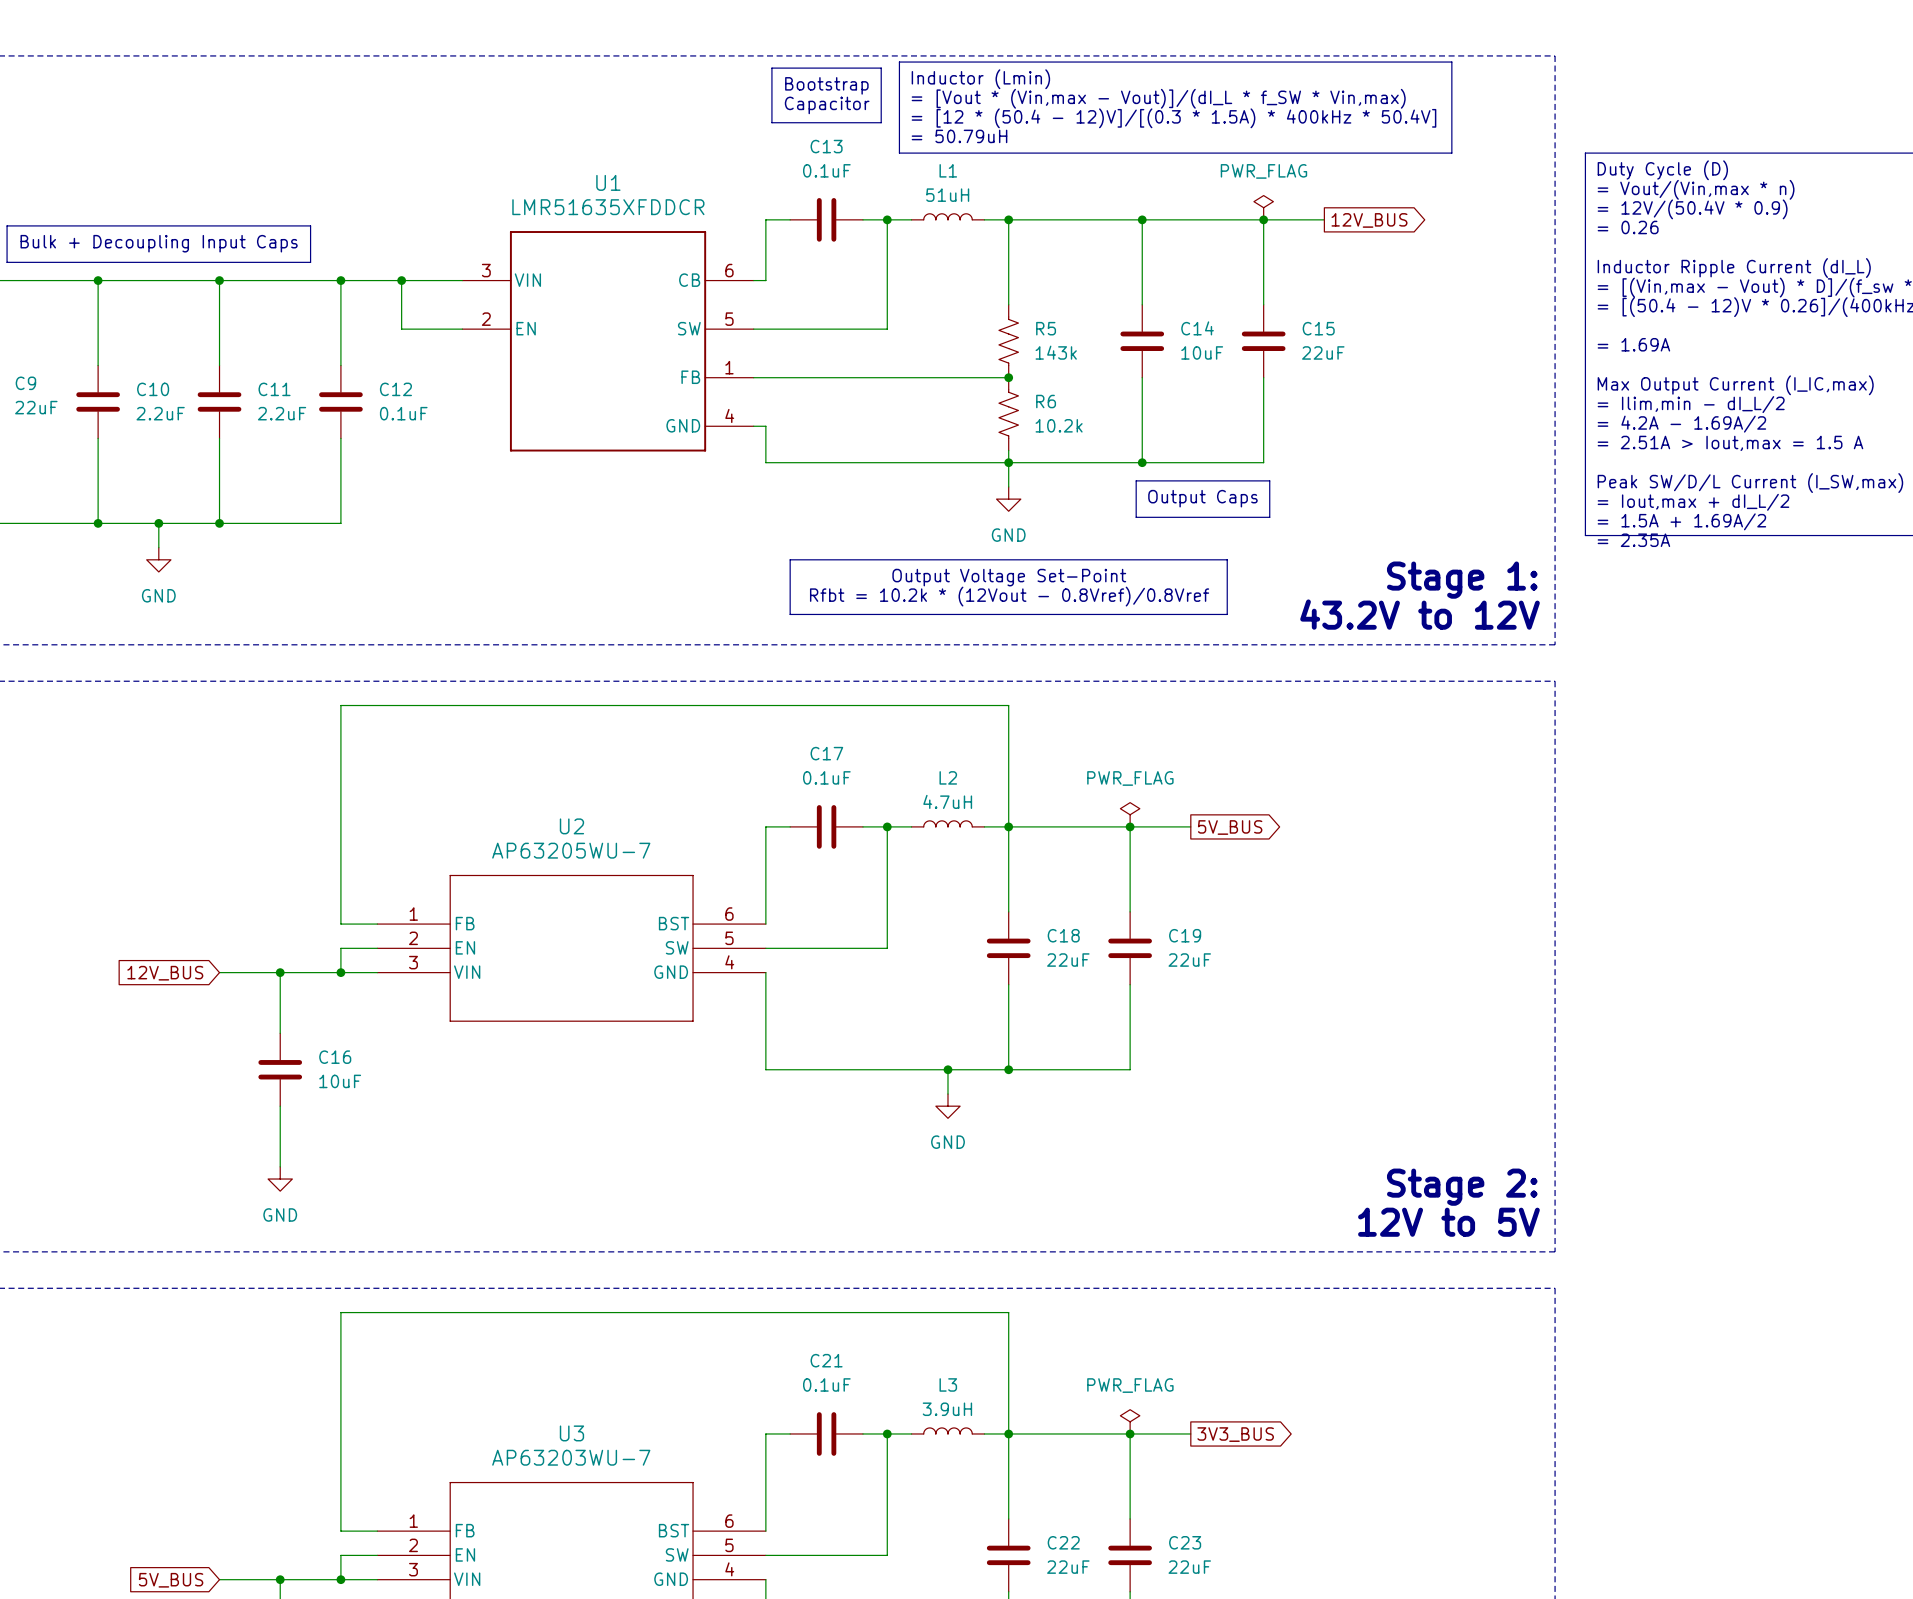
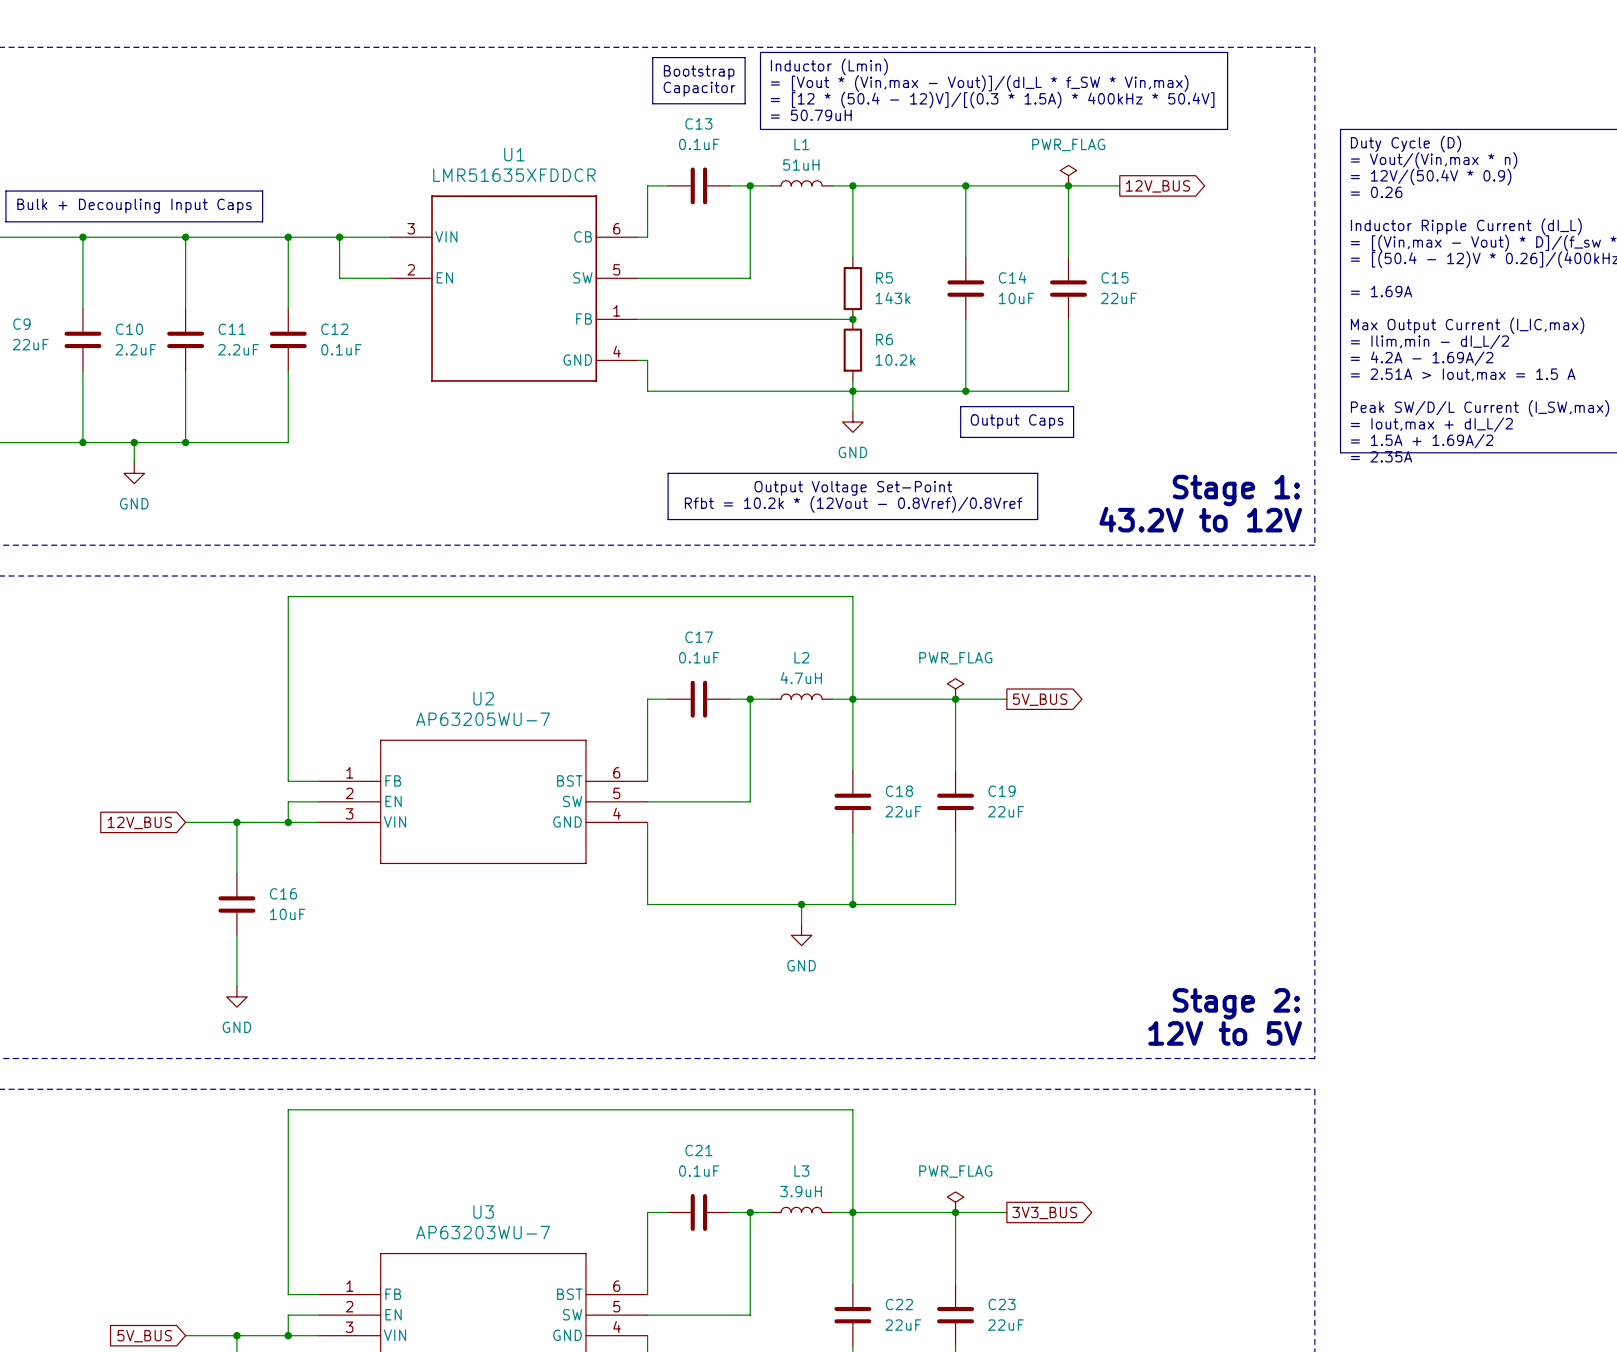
R5 symbol: [998, 304, 1019, 378] -> [843, 257, 863, 320]
R6 symbol: [998, 377, 1019, 451] -> [843, 319, 863, 381]

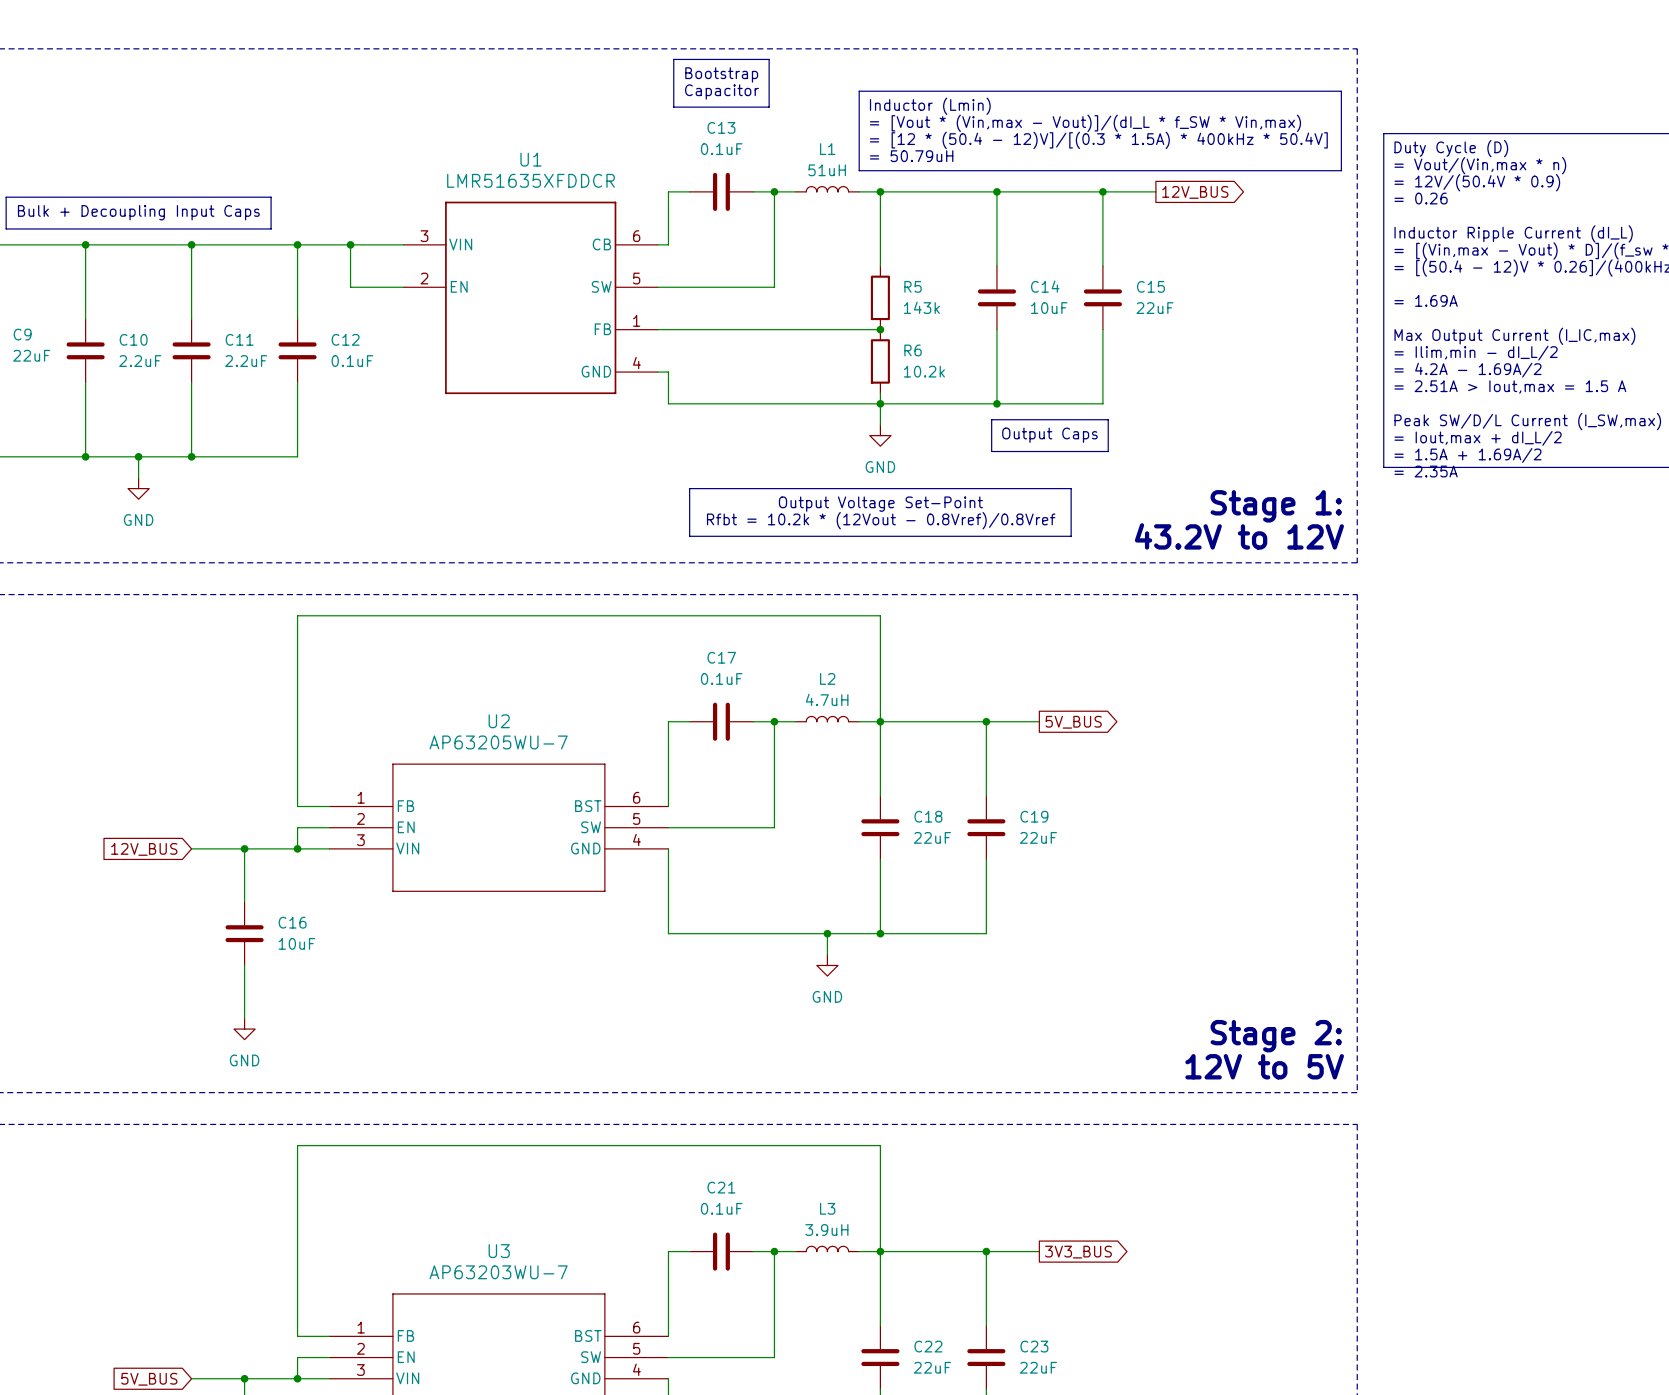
line: (760, 52) (1227, 52) (1227, 129) (760, 129) (760, 52) -> (859, 91) (1341, 91) (1341, 170) (859, 170) (859, 91)
text position: Inductor (Lmin) (829, 66) -> Inductor (Lmin) (930, 106)
text position: = [Vout * (Vin,max - Vout)]/(dI_L * f_SW * Vin,max) (979, 83) -> = [Vout * (Vin,max - Vout)]/(dI_L * f_SW * Vin,max) (1085, 123)
text position: = [12 * (50.4 - 12)V]/[(0.3 * 1.5A) * 400kHz * 50.4V] (992, 100) -> = [12 * (50.4 - 12)V]/[(0.3 * 1.5A) * 400kHz * 50.4V] (1098, 140)
text position: = 50.79uH (811, 115) -> = 50.79uH (911, 156)
power symbol: PWR_FLAG (1068, 175) -> none
power symbol: PWR_FLAG (955, 688) -> none
power symbol: PWR_FLAG (955, 1202) -> none

